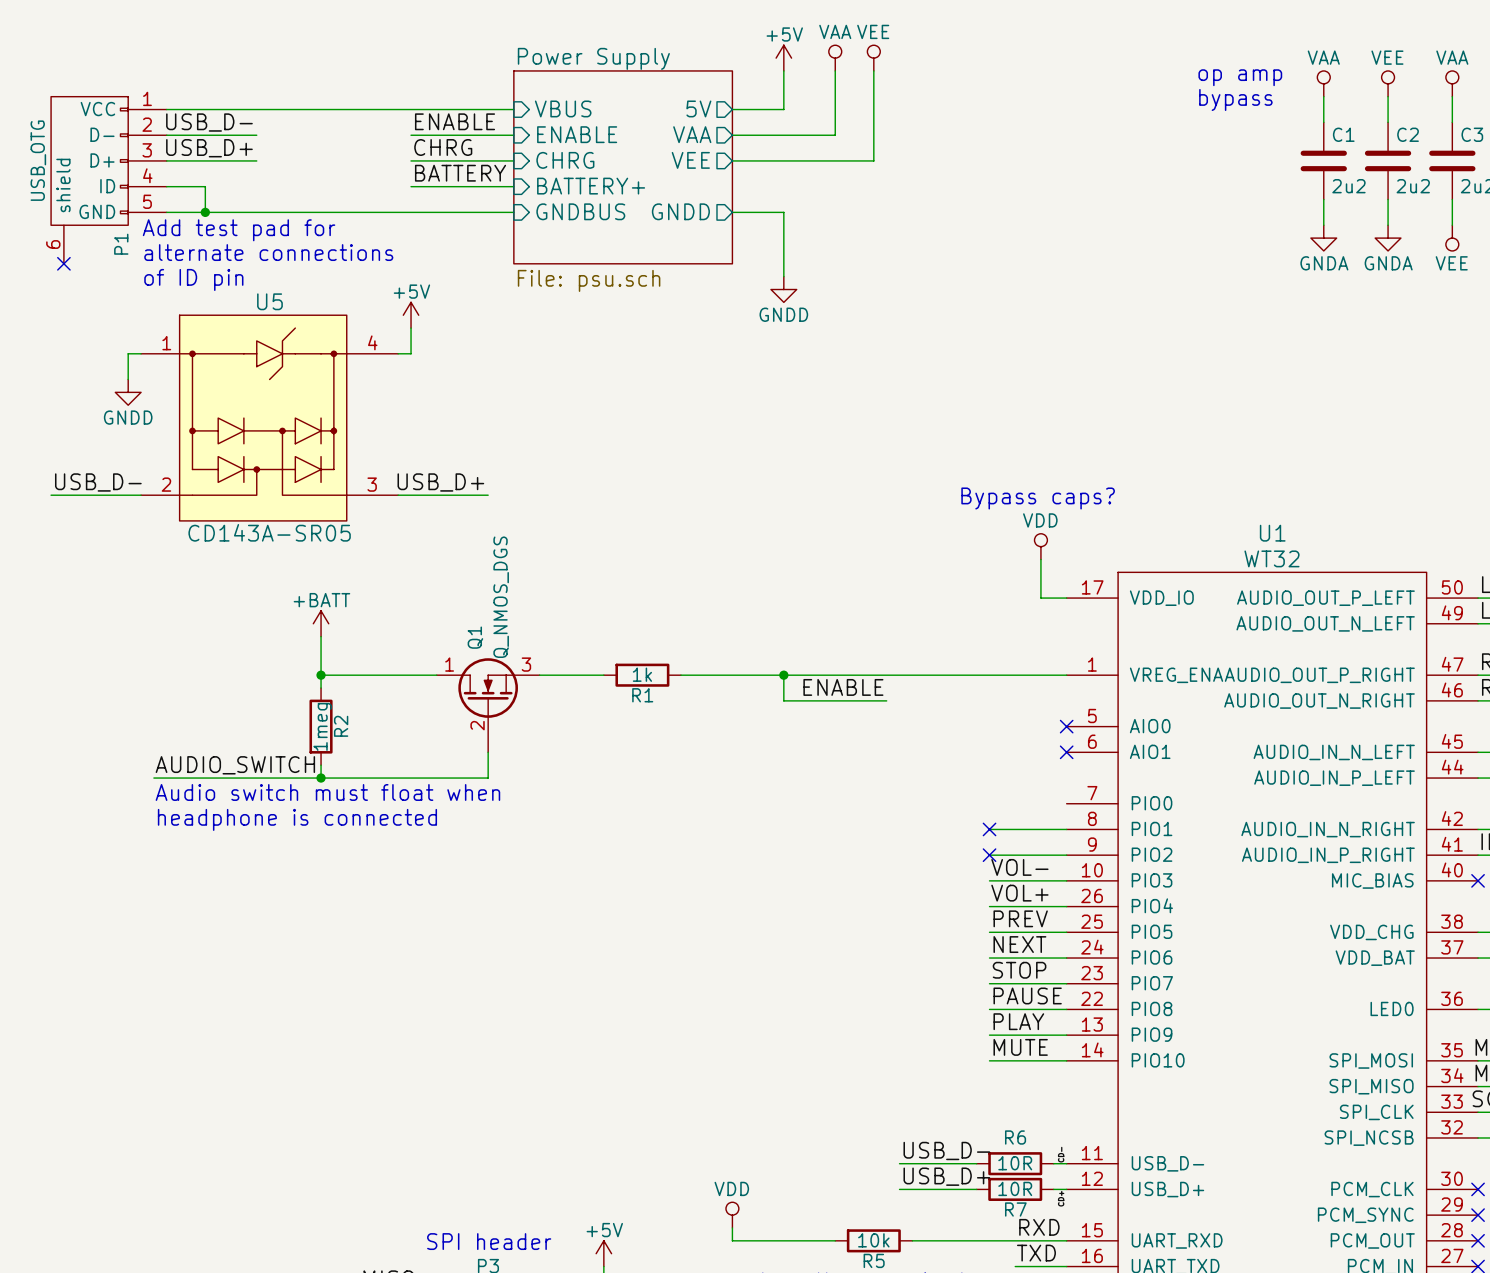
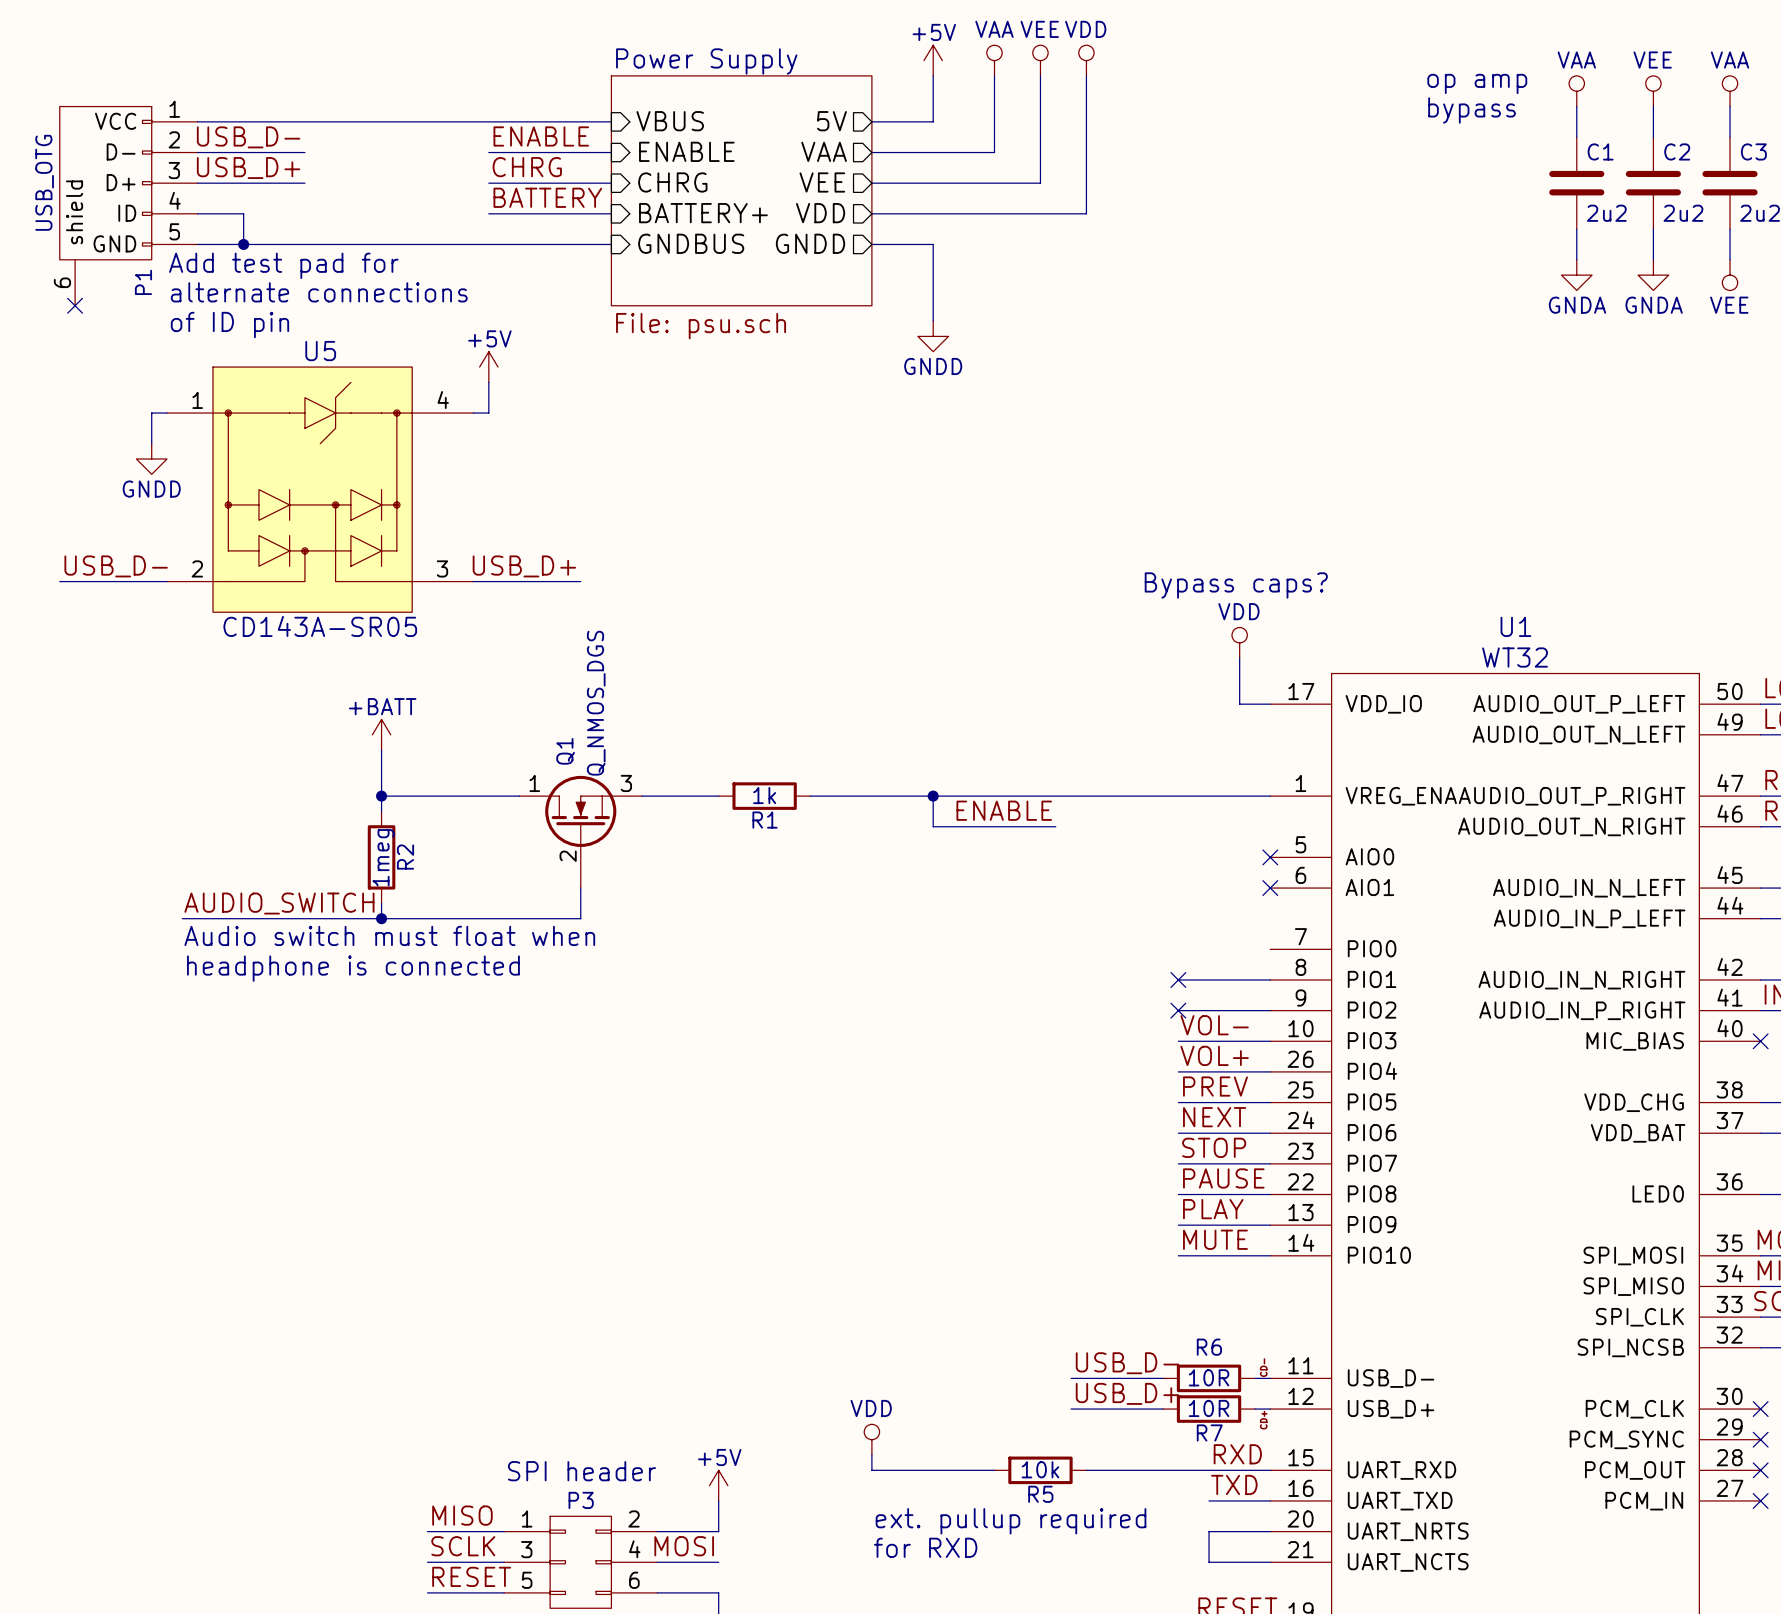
power symbol: none -> VDD (1086, 60)
wire: none -> (1086, 75) (1086, 213) (871, 213)
sheet pin: none -> VDD (820, 213)

